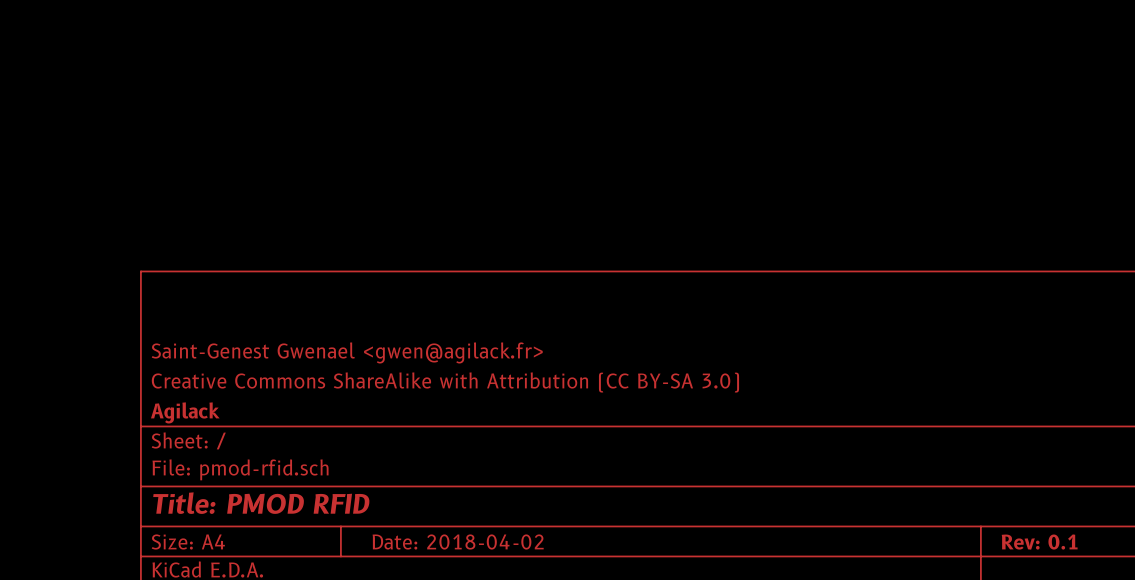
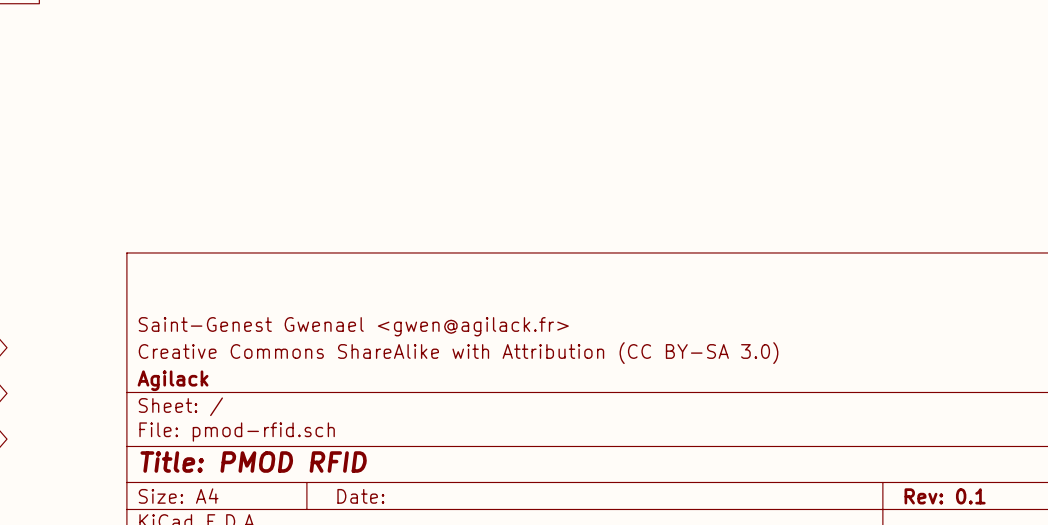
title block: Date: 2018-04-02 (458, 541) -> Date: (360, 496)

